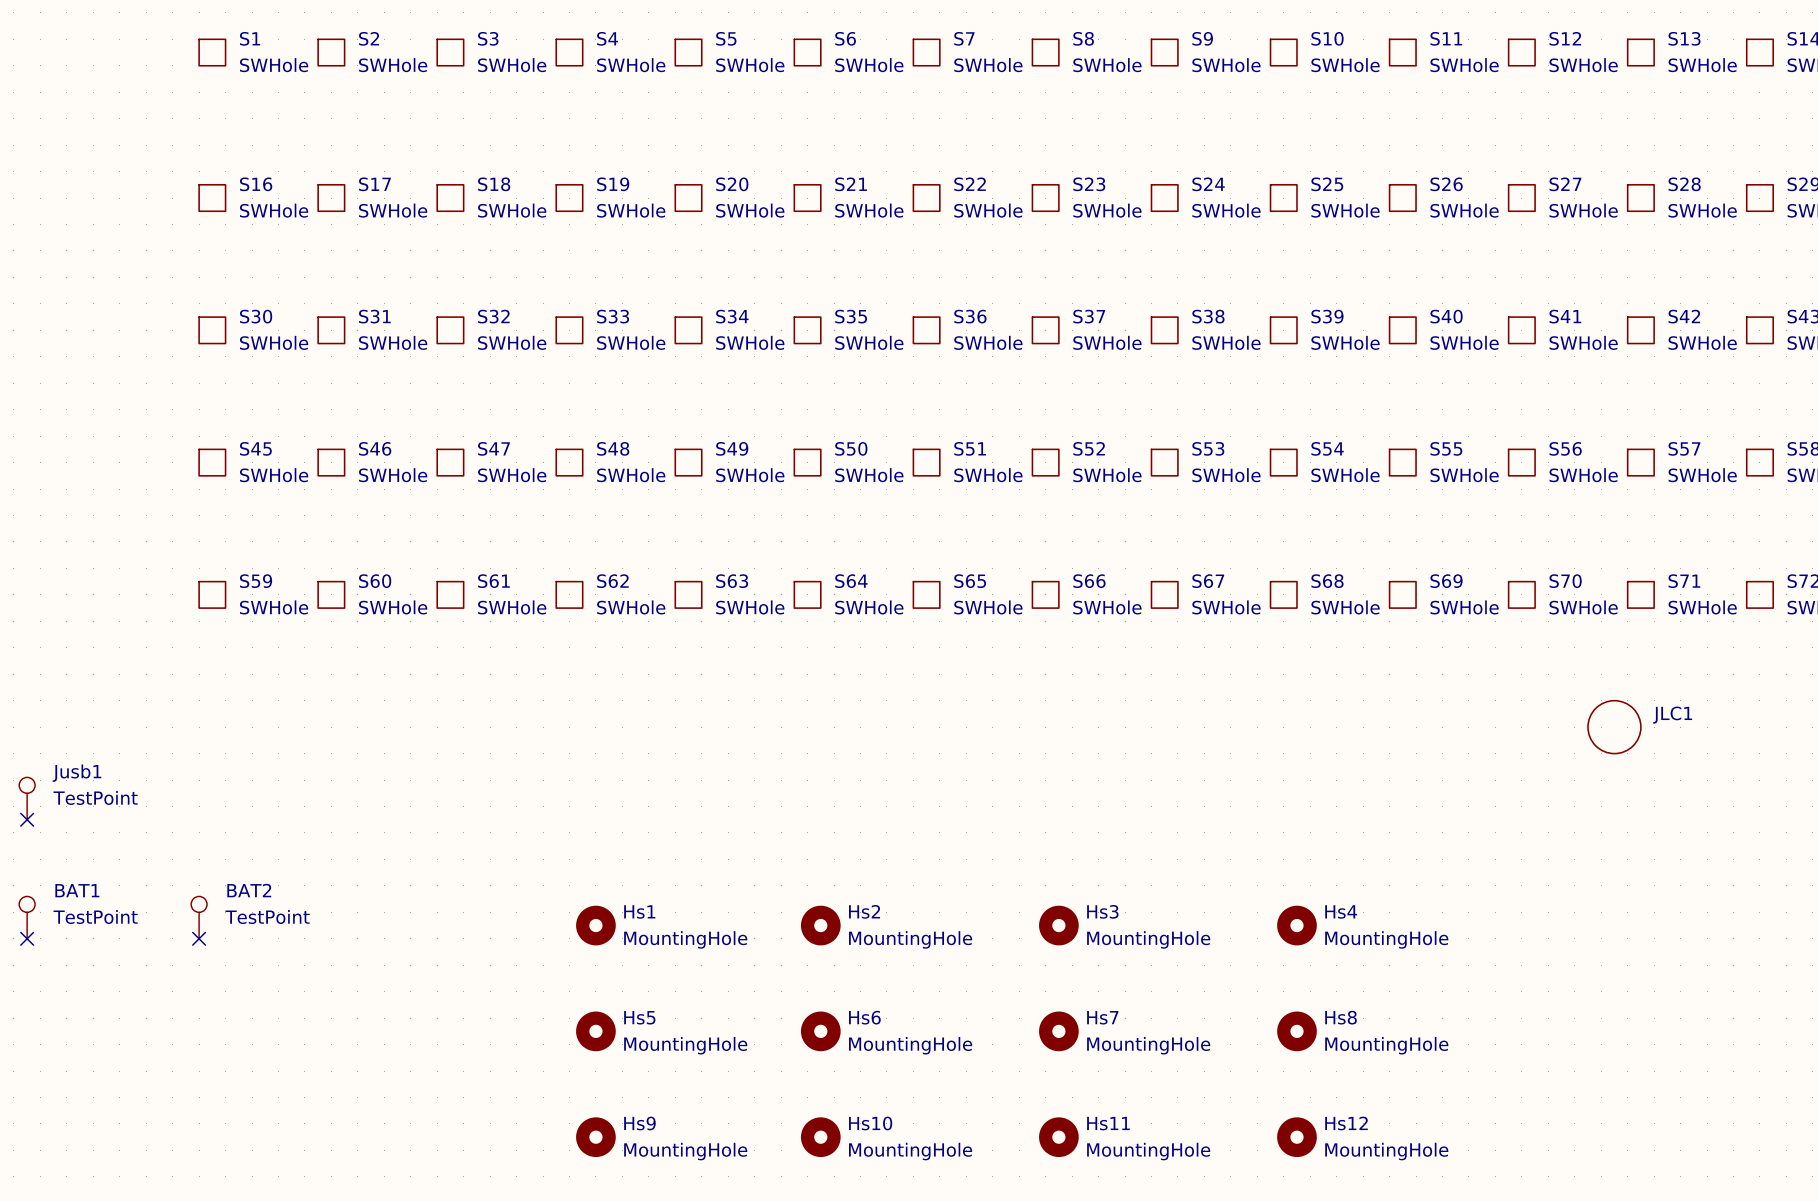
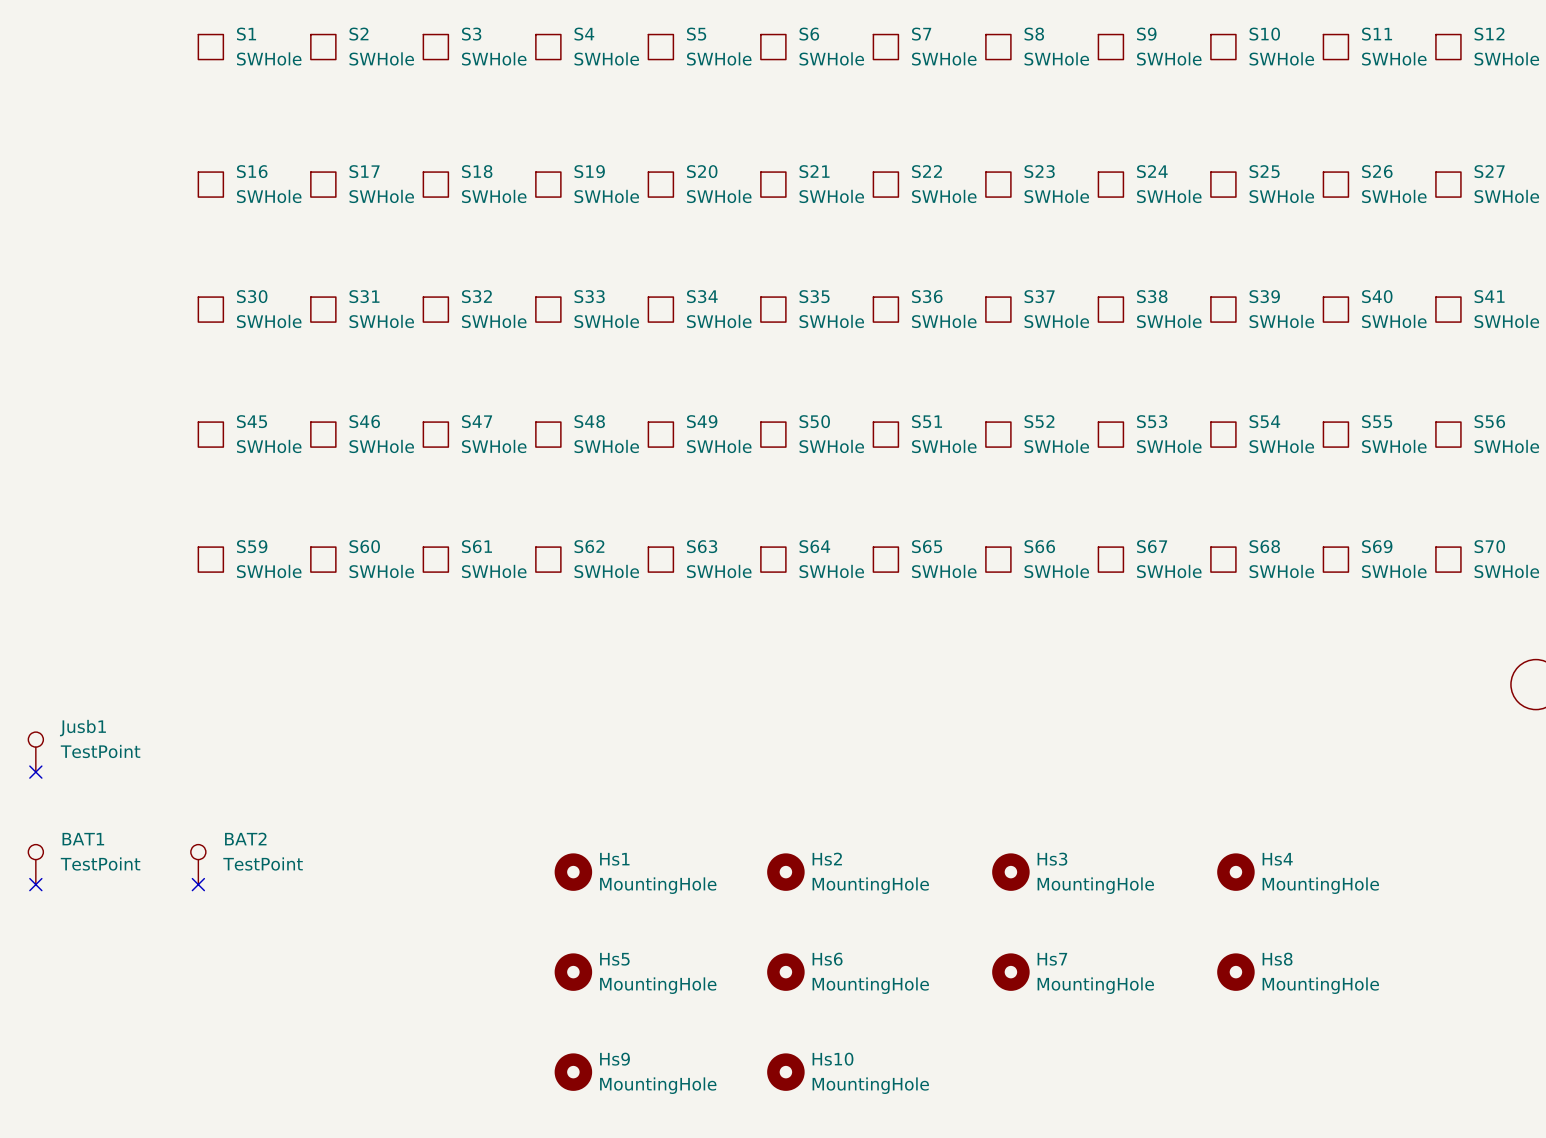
Hs11: MountingHole (1058, 1137) -> none
Hs12: MountingHole (1296, 1137) -> none

